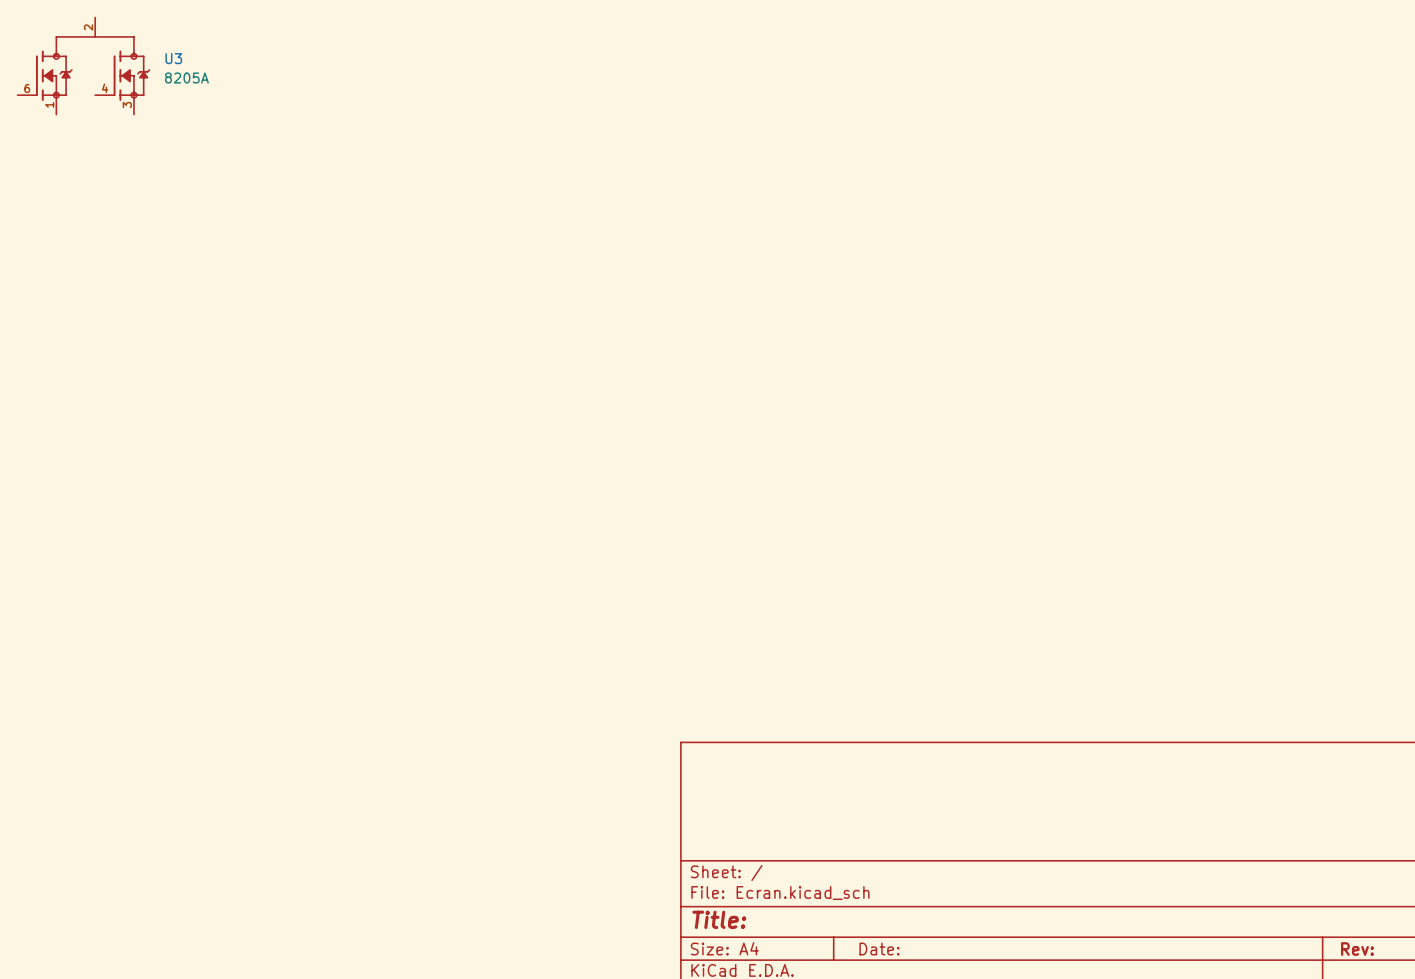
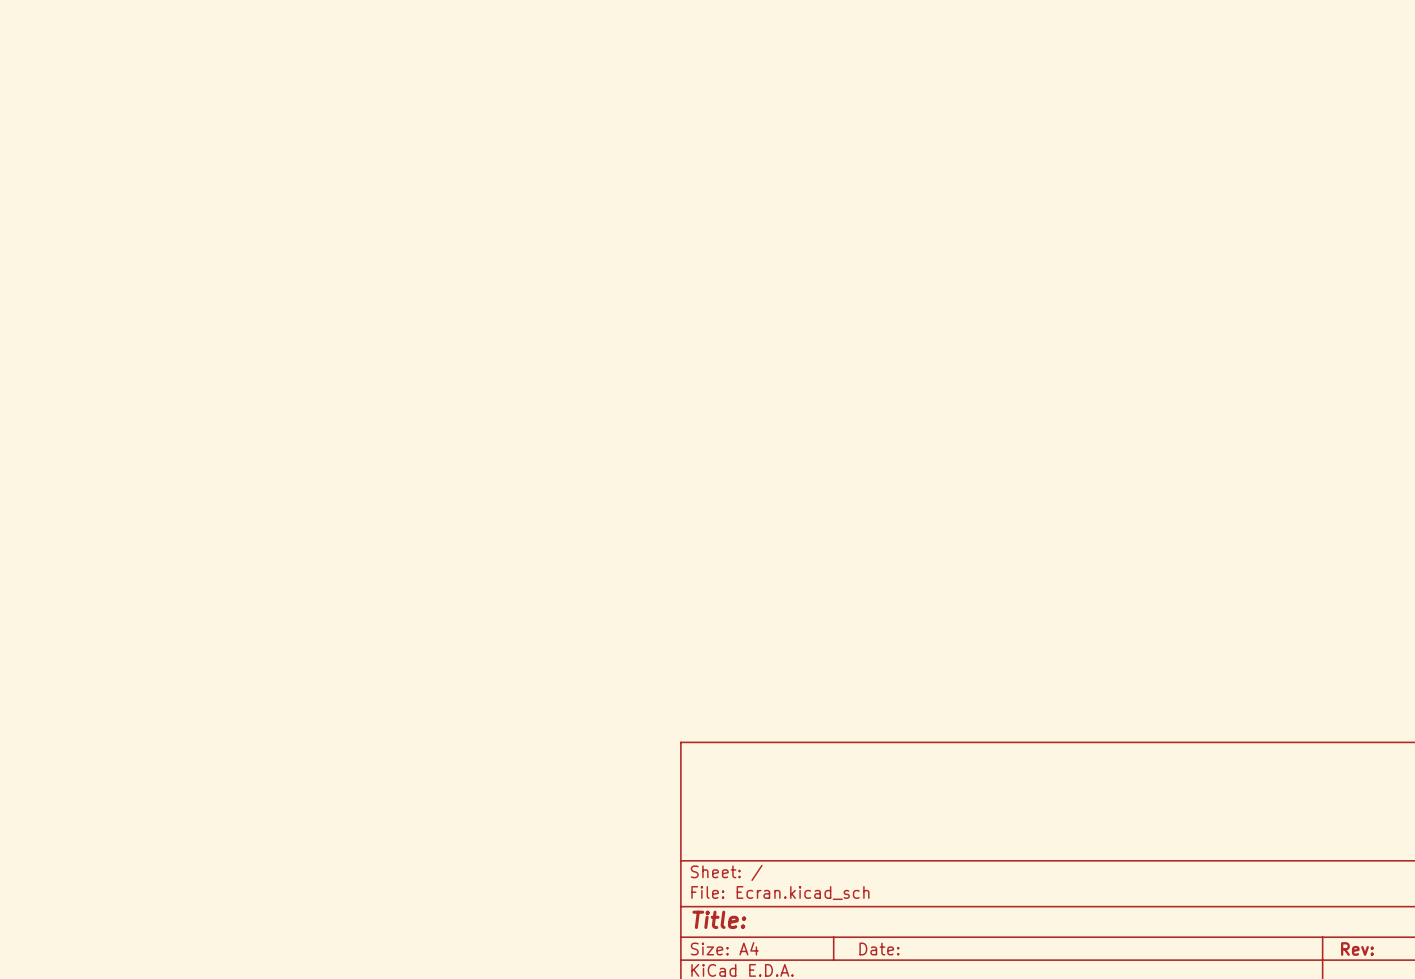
U3: 8205A (83, 66) -> none

